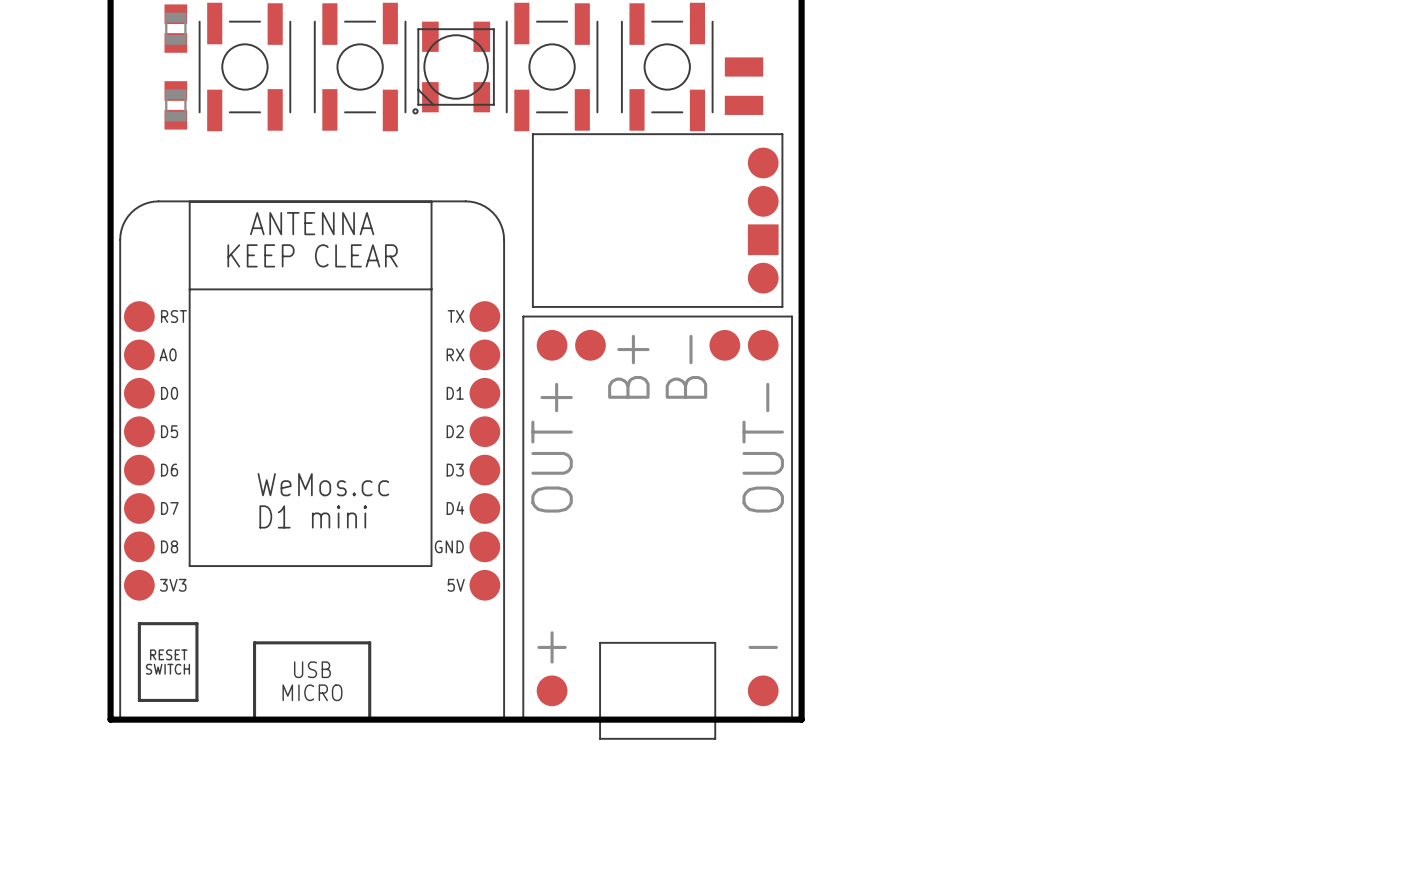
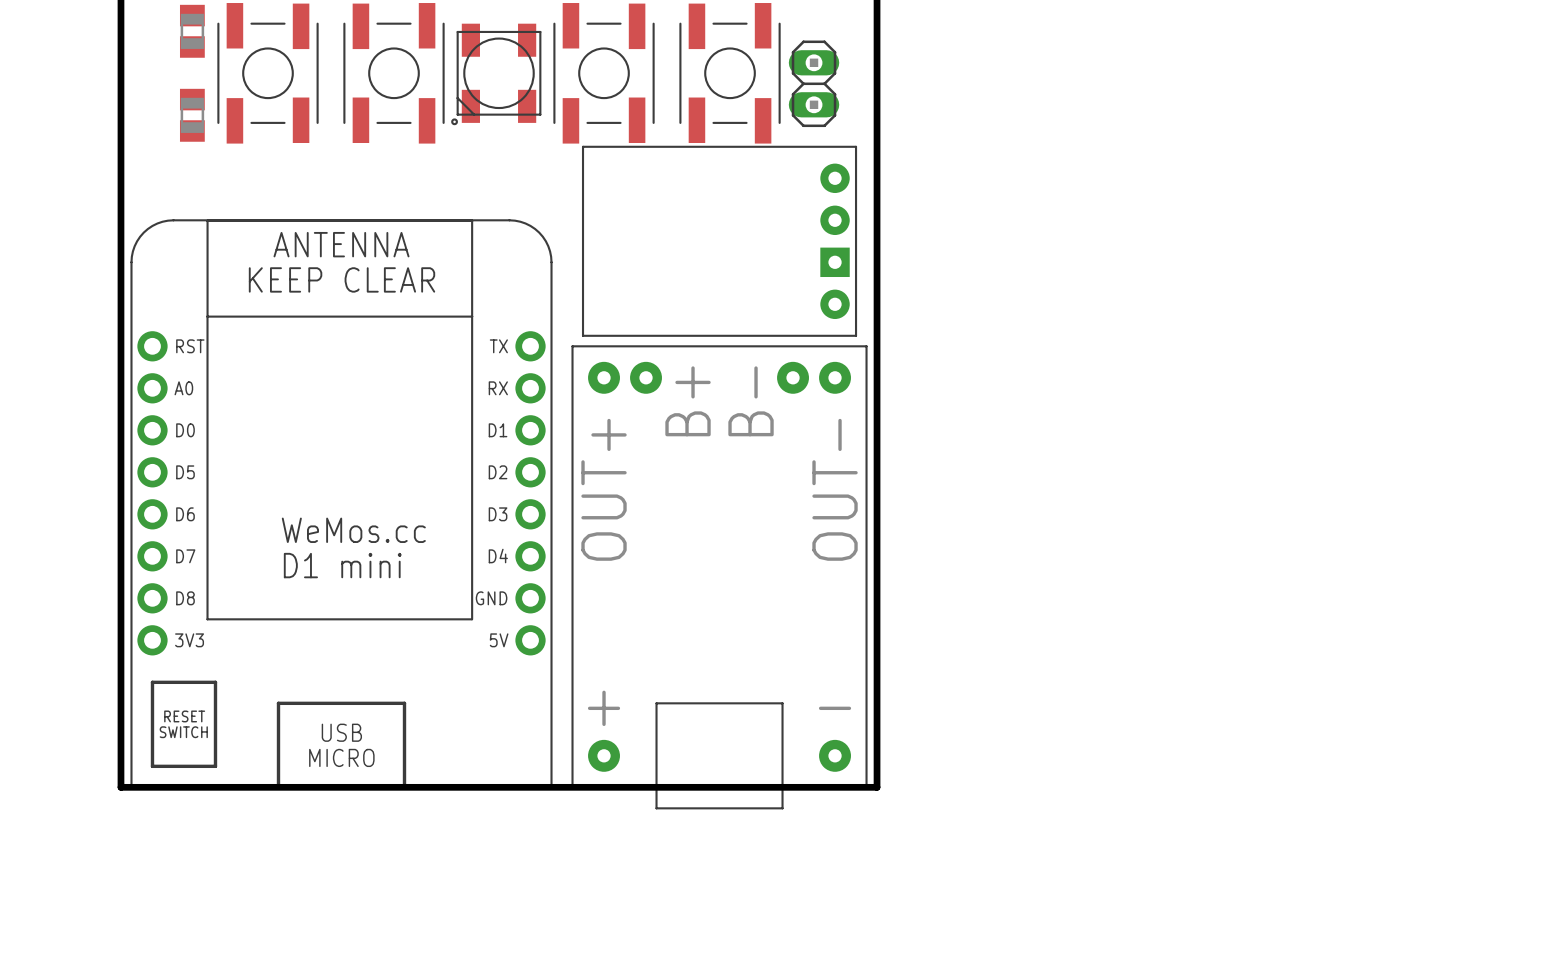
part footprint: [724, 57, 764, 77] -> [788, 40, 840, 128]
part: (744, 105) -> none
part footprint: [531, 133, 784, 308] -> [581, 145, 858, 337]
part footprint: [119, 200, 506, 722] -> [130, 219, 553, 790]
part footprint: [522, 315, 793, 740] -> [571, 345, 868, 810]

